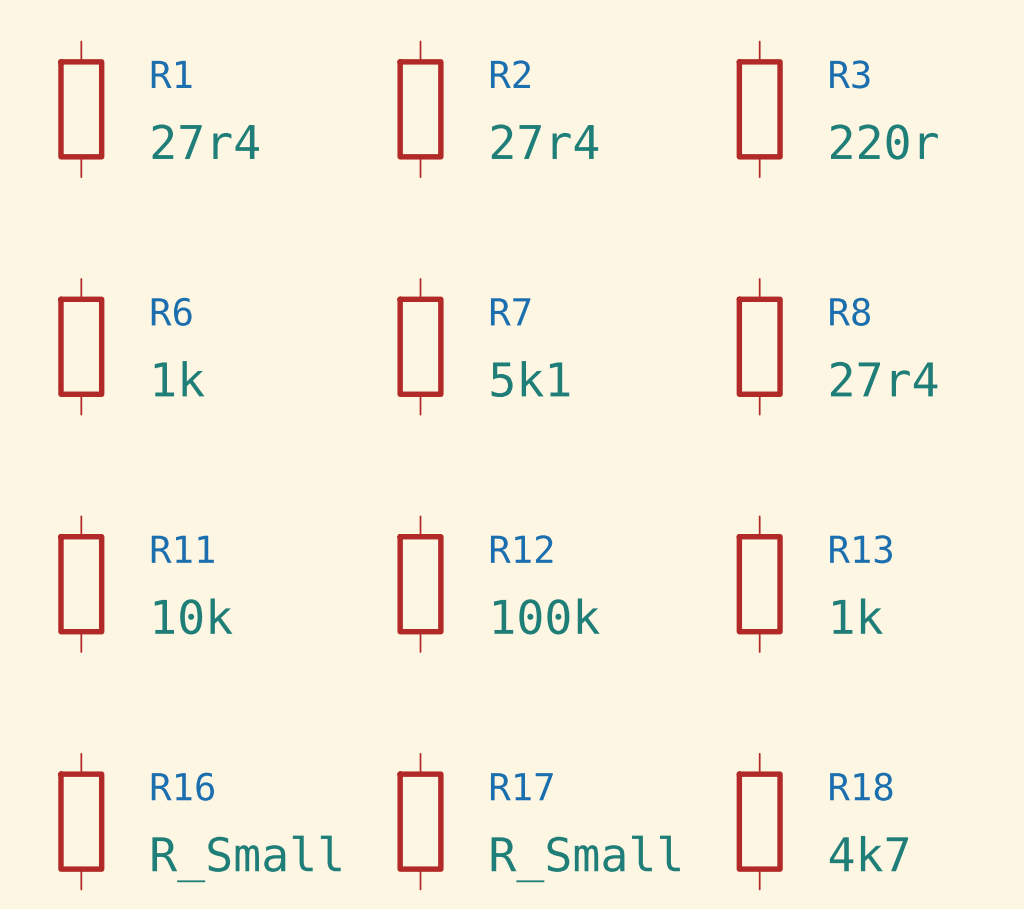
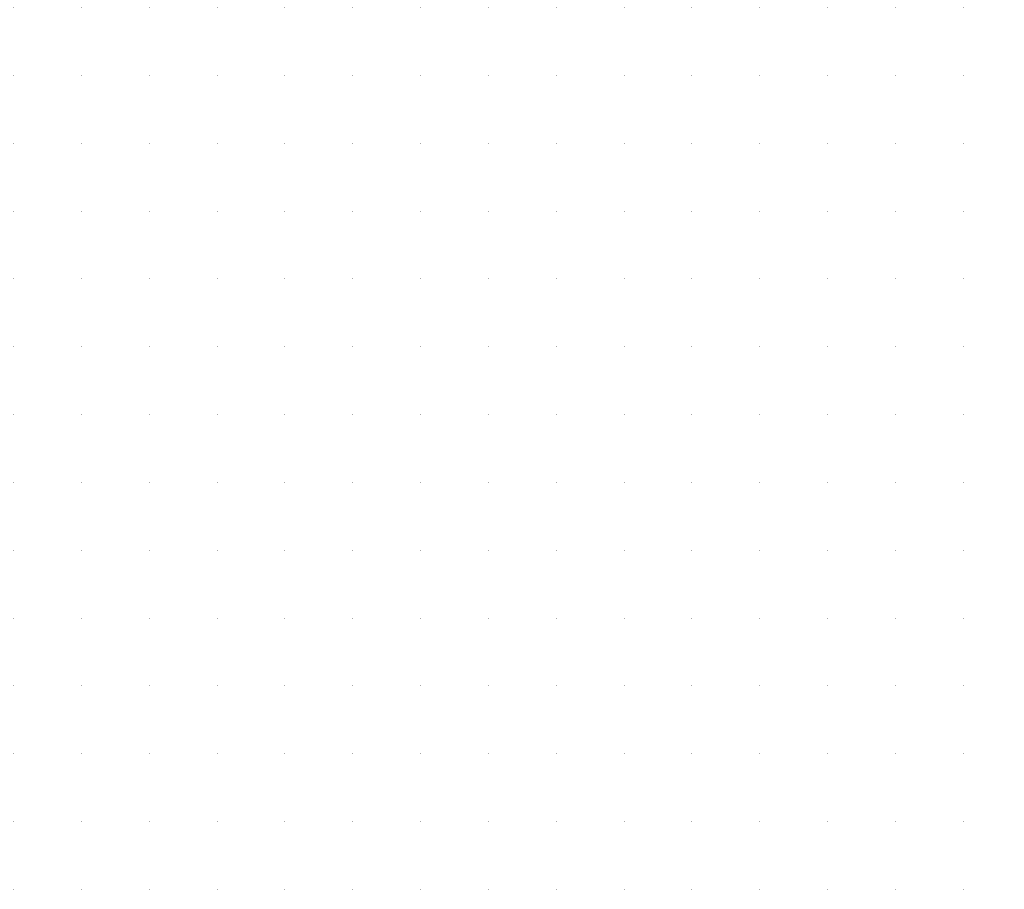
R1: 27r4 (81, 109) -> none
R2: 27r4 (420, 109) -> none
R3: 220r (759, 109) -> none
R6: 1k (81, 346) -> none
R7: 5k1 (420, 346) -> none
R8: 27r4 (759, 346) -> none
R11: 10k (81, 584) -> none
R12: 100k (420, 584) -> none
R13: 1k (759, 584) -> none
R16: R_Small (81, 821) -> none
R17: R_Small (420, 821) -> none
R18: 4k7 (759, 821) -> none

